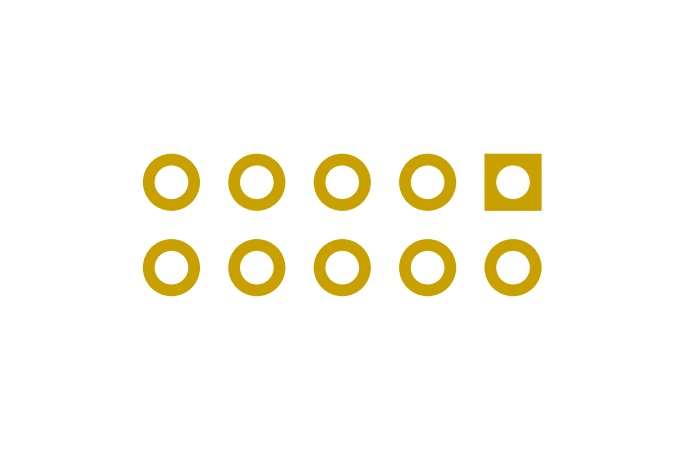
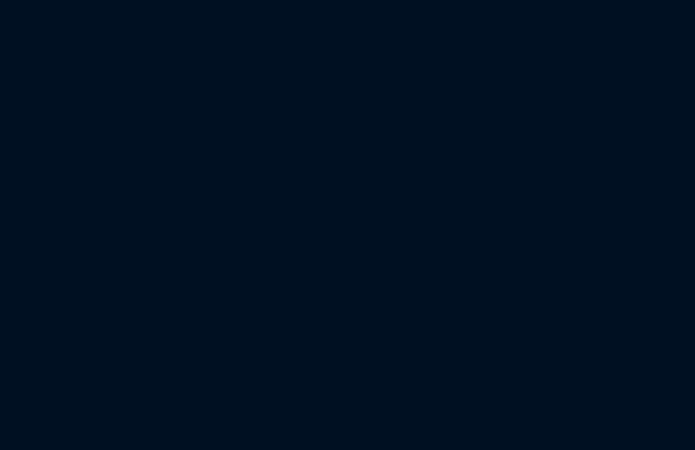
part: (342, 224) -> none

